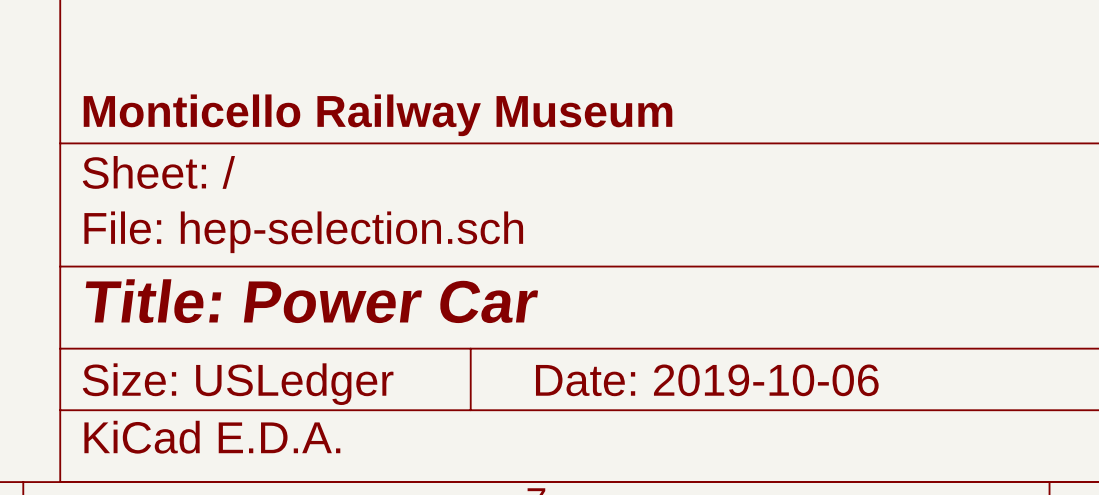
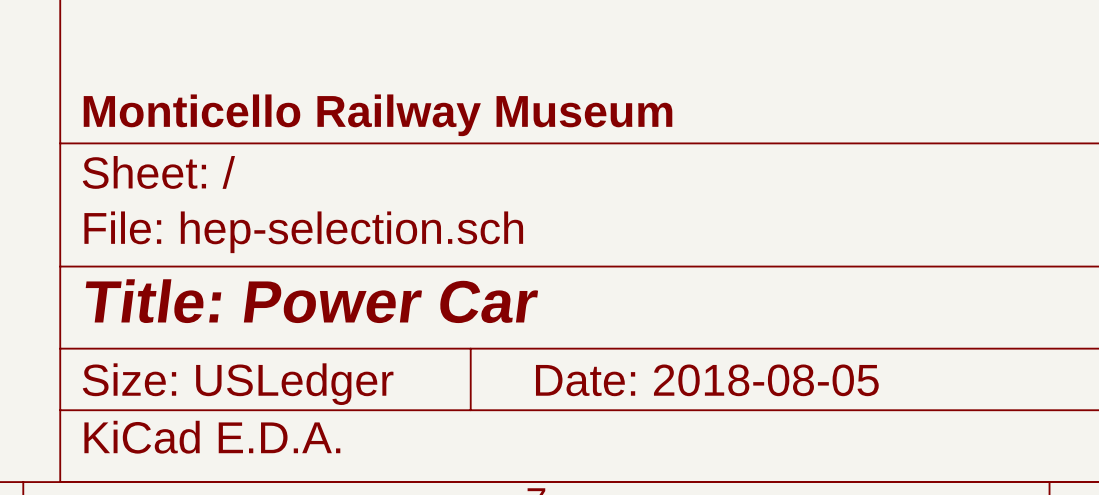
title block: Date: 2019-10-06 (707, 380) -> Date: 2018-08-05 (707, 380)

